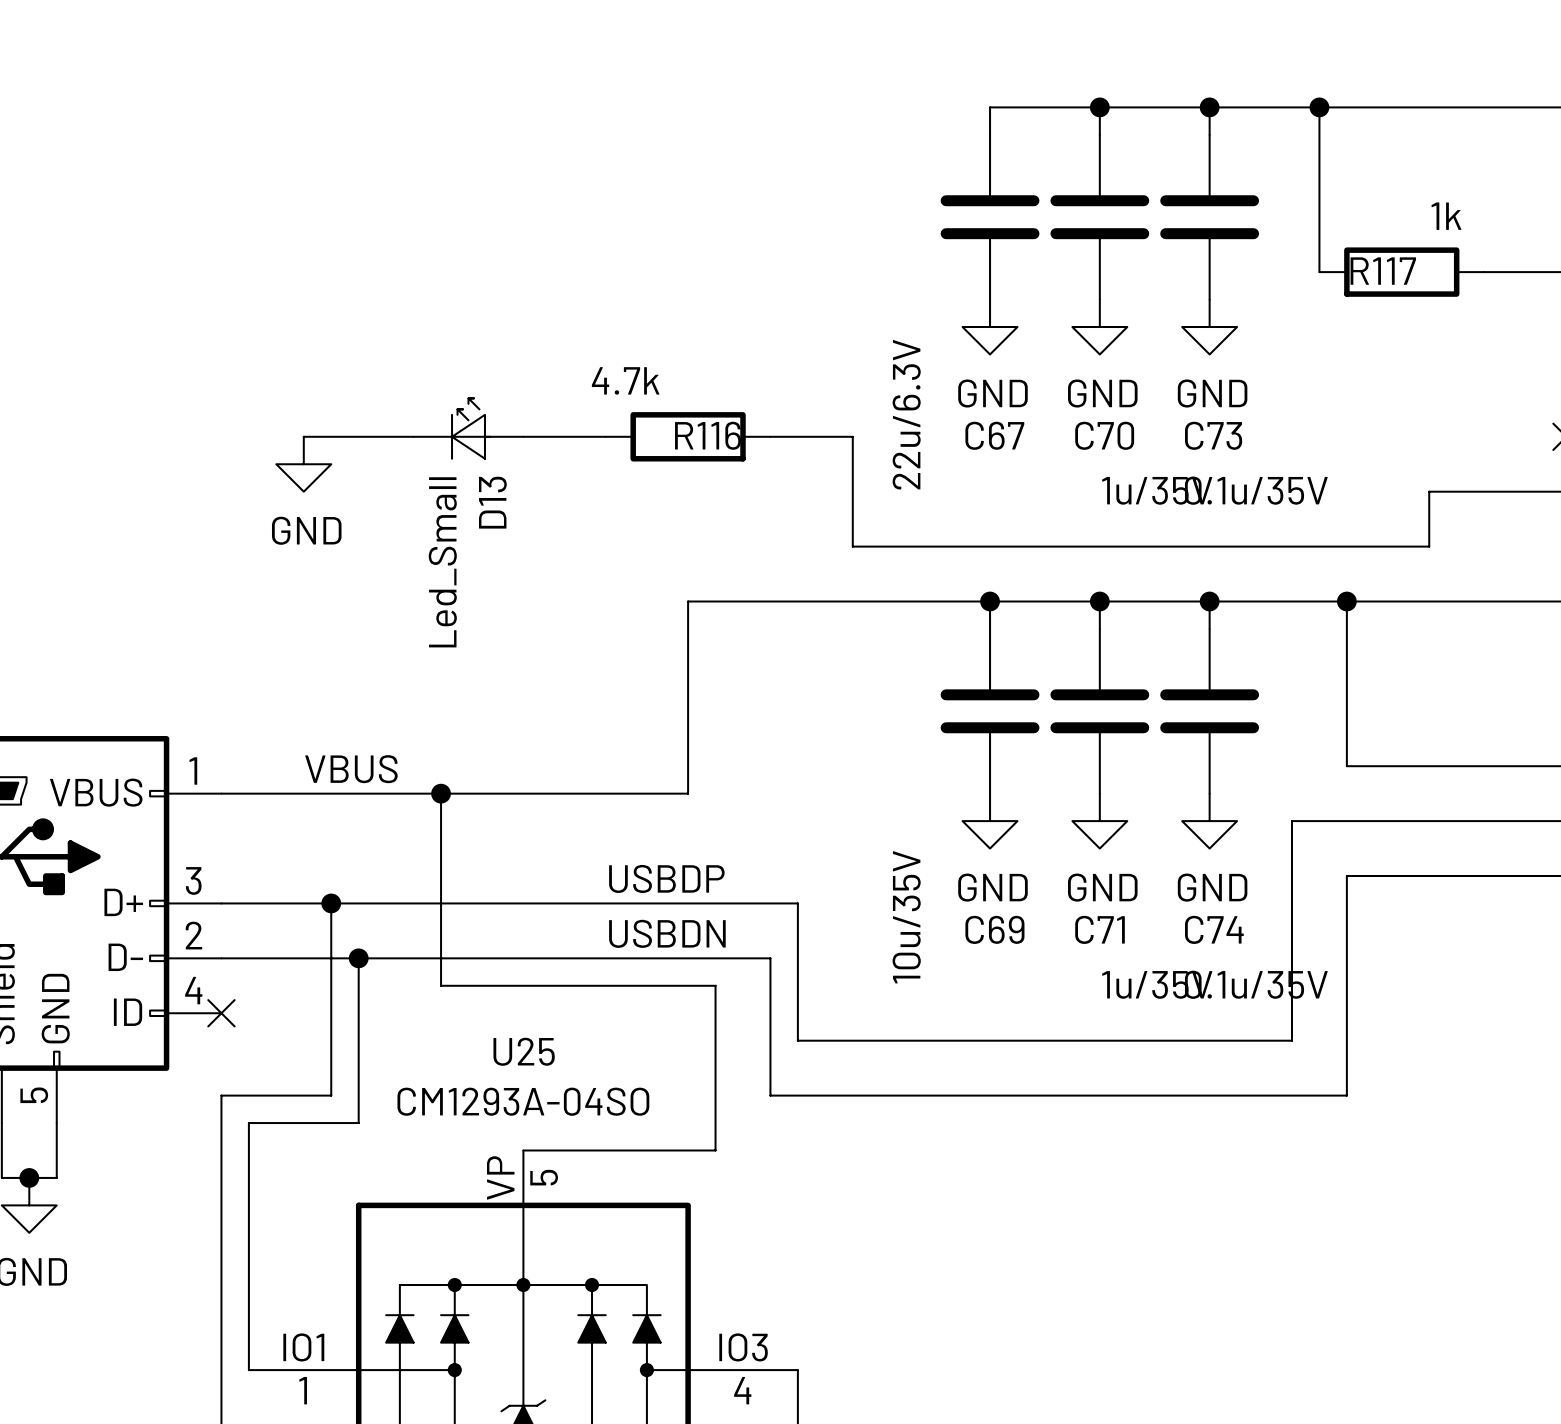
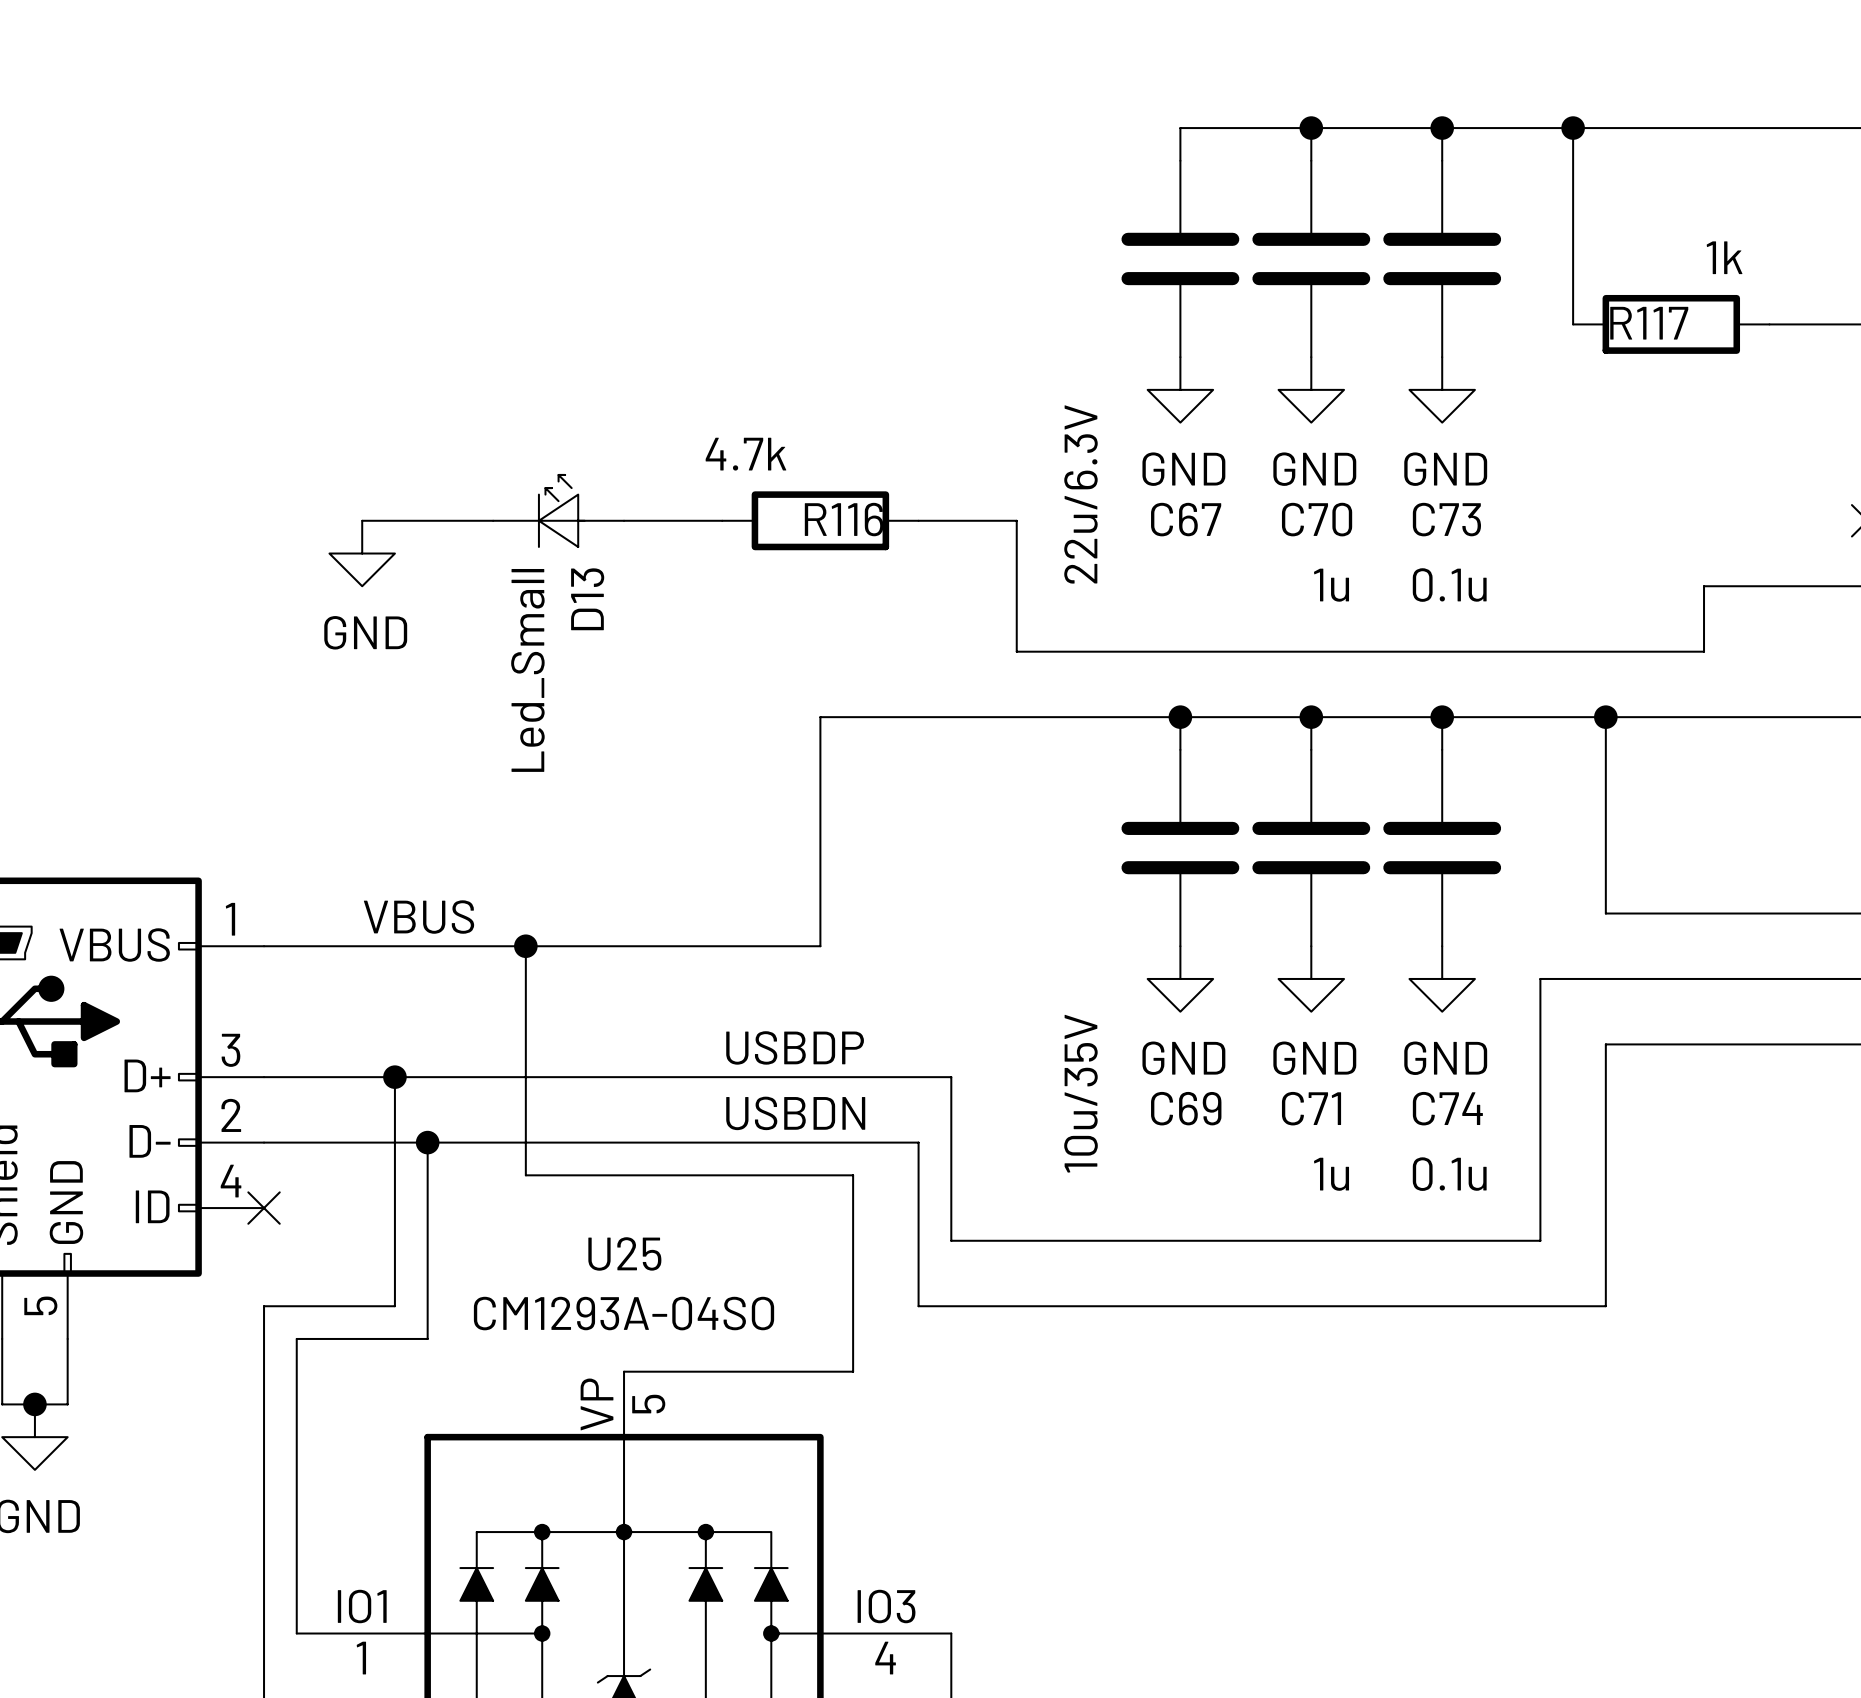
C70 value: 1u/35V (1157, 490) -> 1u (1331, 585)
C73 value: 0.1u/35V (1256, 490) -> 0.1u (1449, 585)
C71 value: 1u/35V (1157, 984) -> 1u (1331, 1174)
C74 value: 0.1u/35V (1256, 984) -> 0.1u (1449, 1174)

